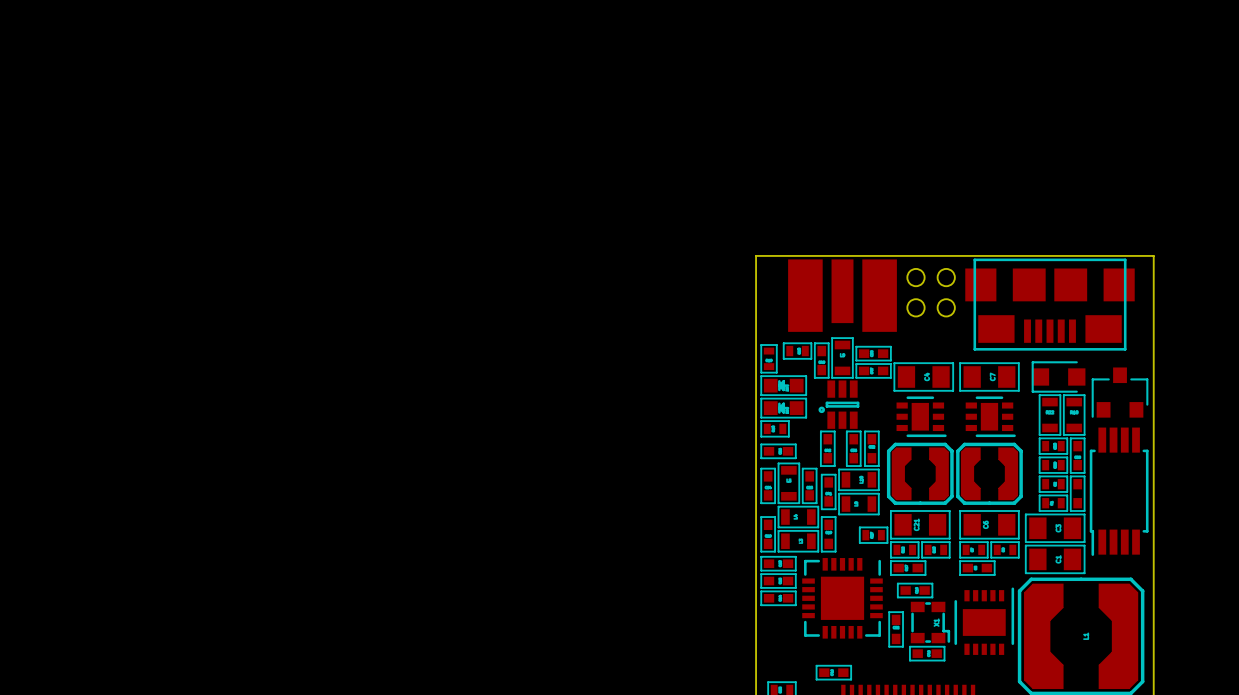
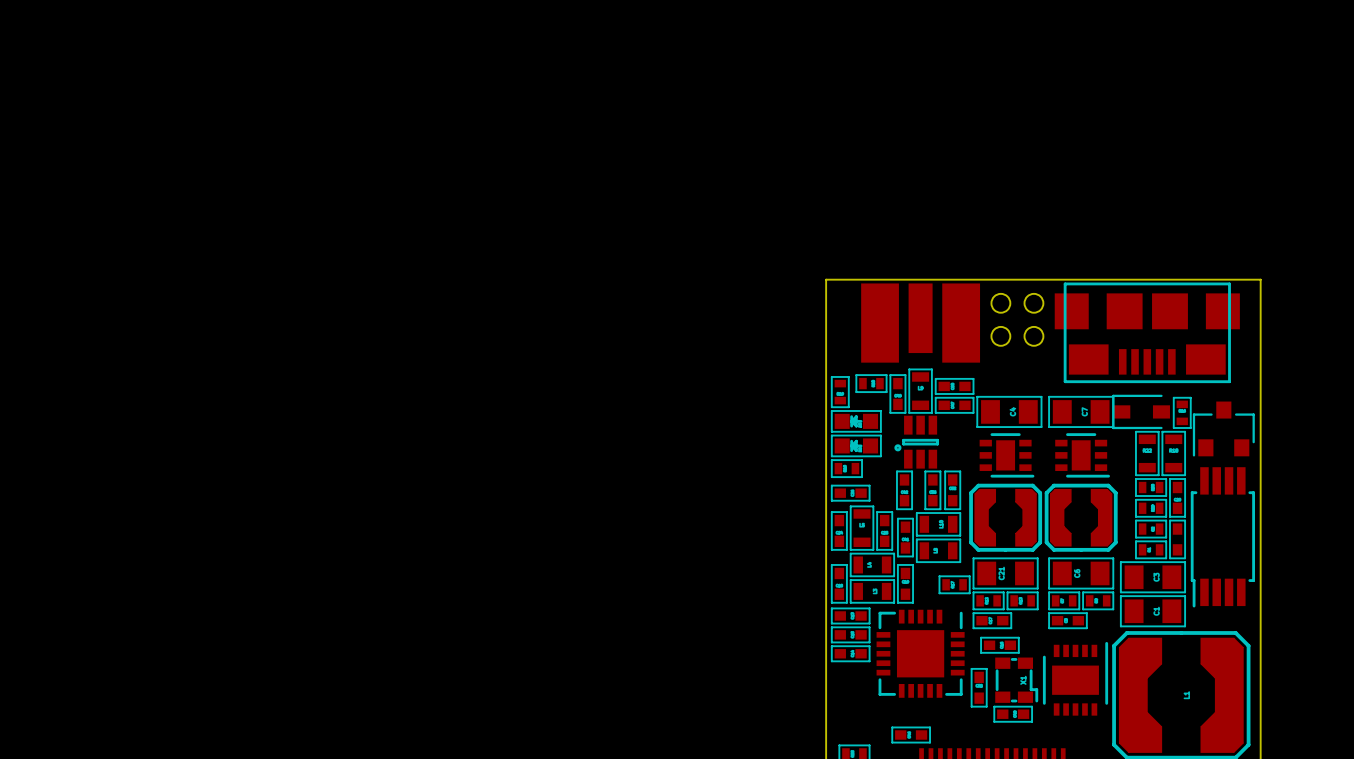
part footprint: [1031, 361, 1086, 393] -> [1112, 394, 1170, 430]
part: none -> (1182, 412)

